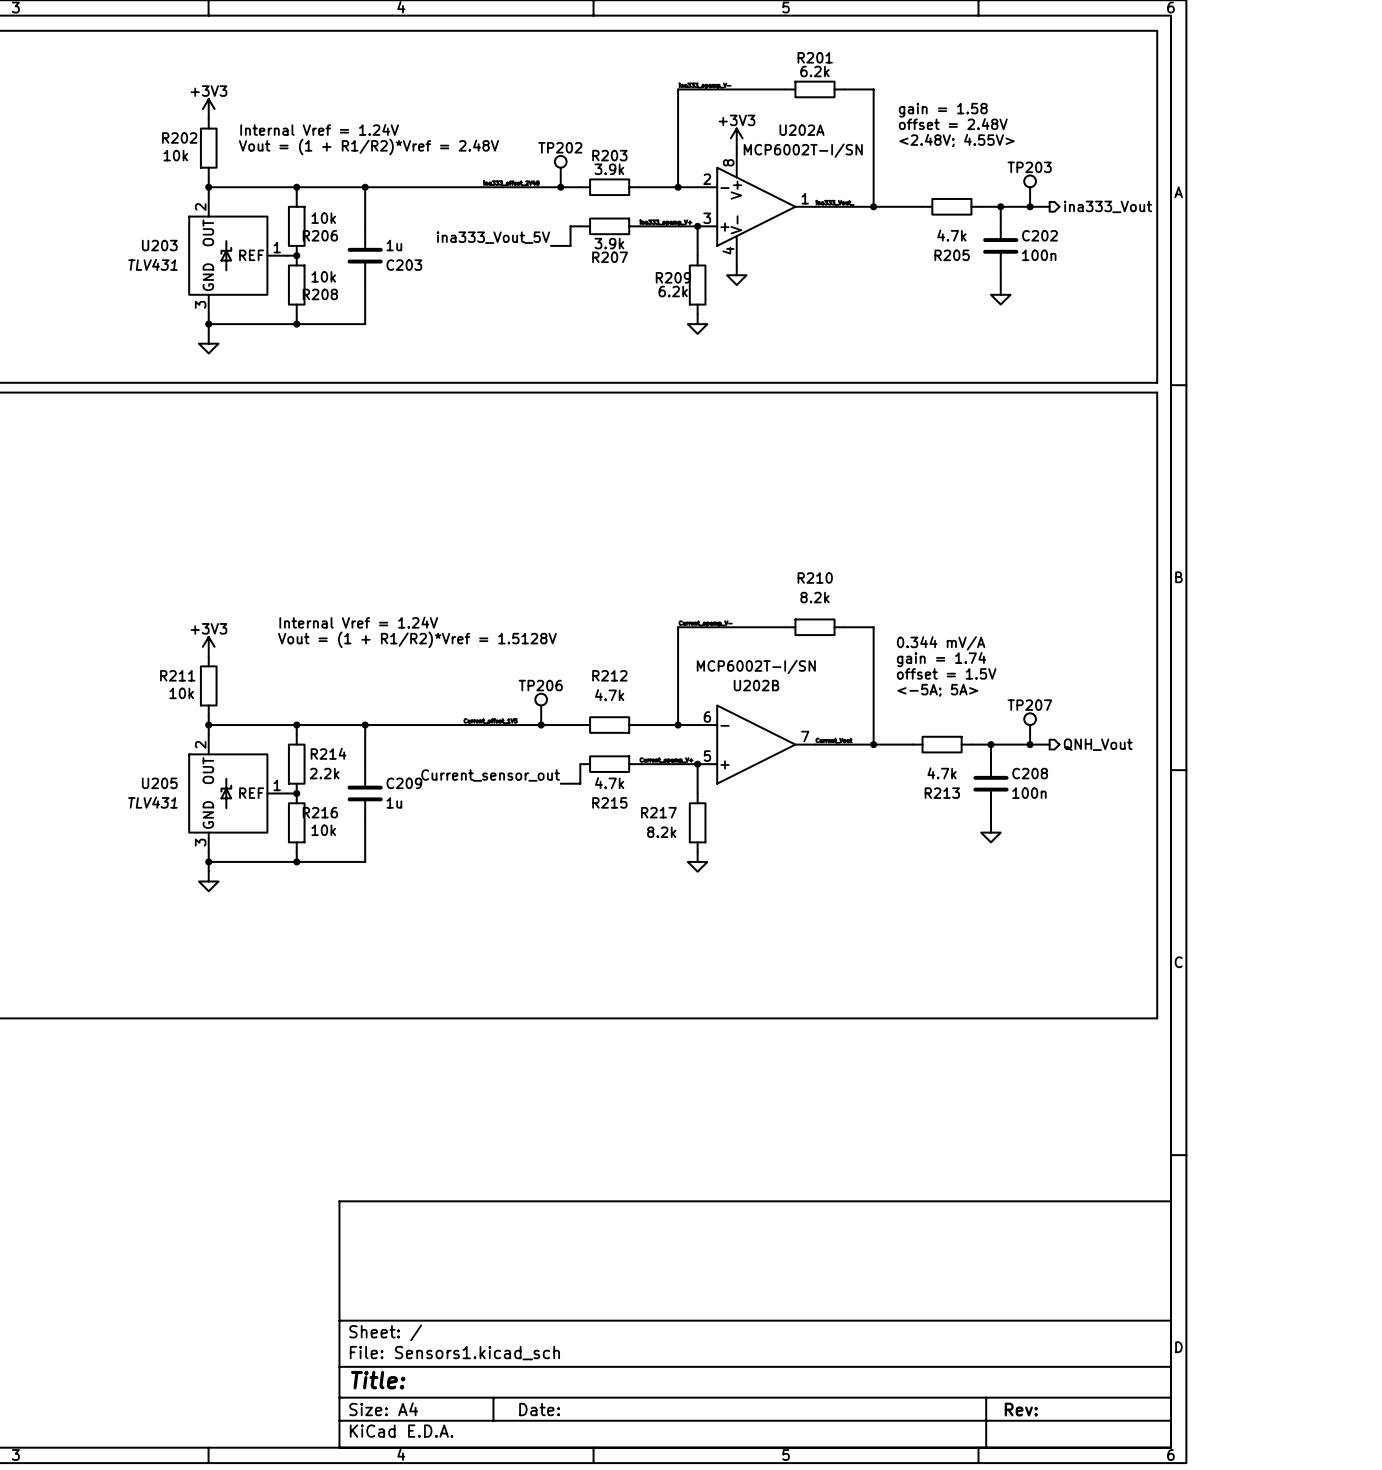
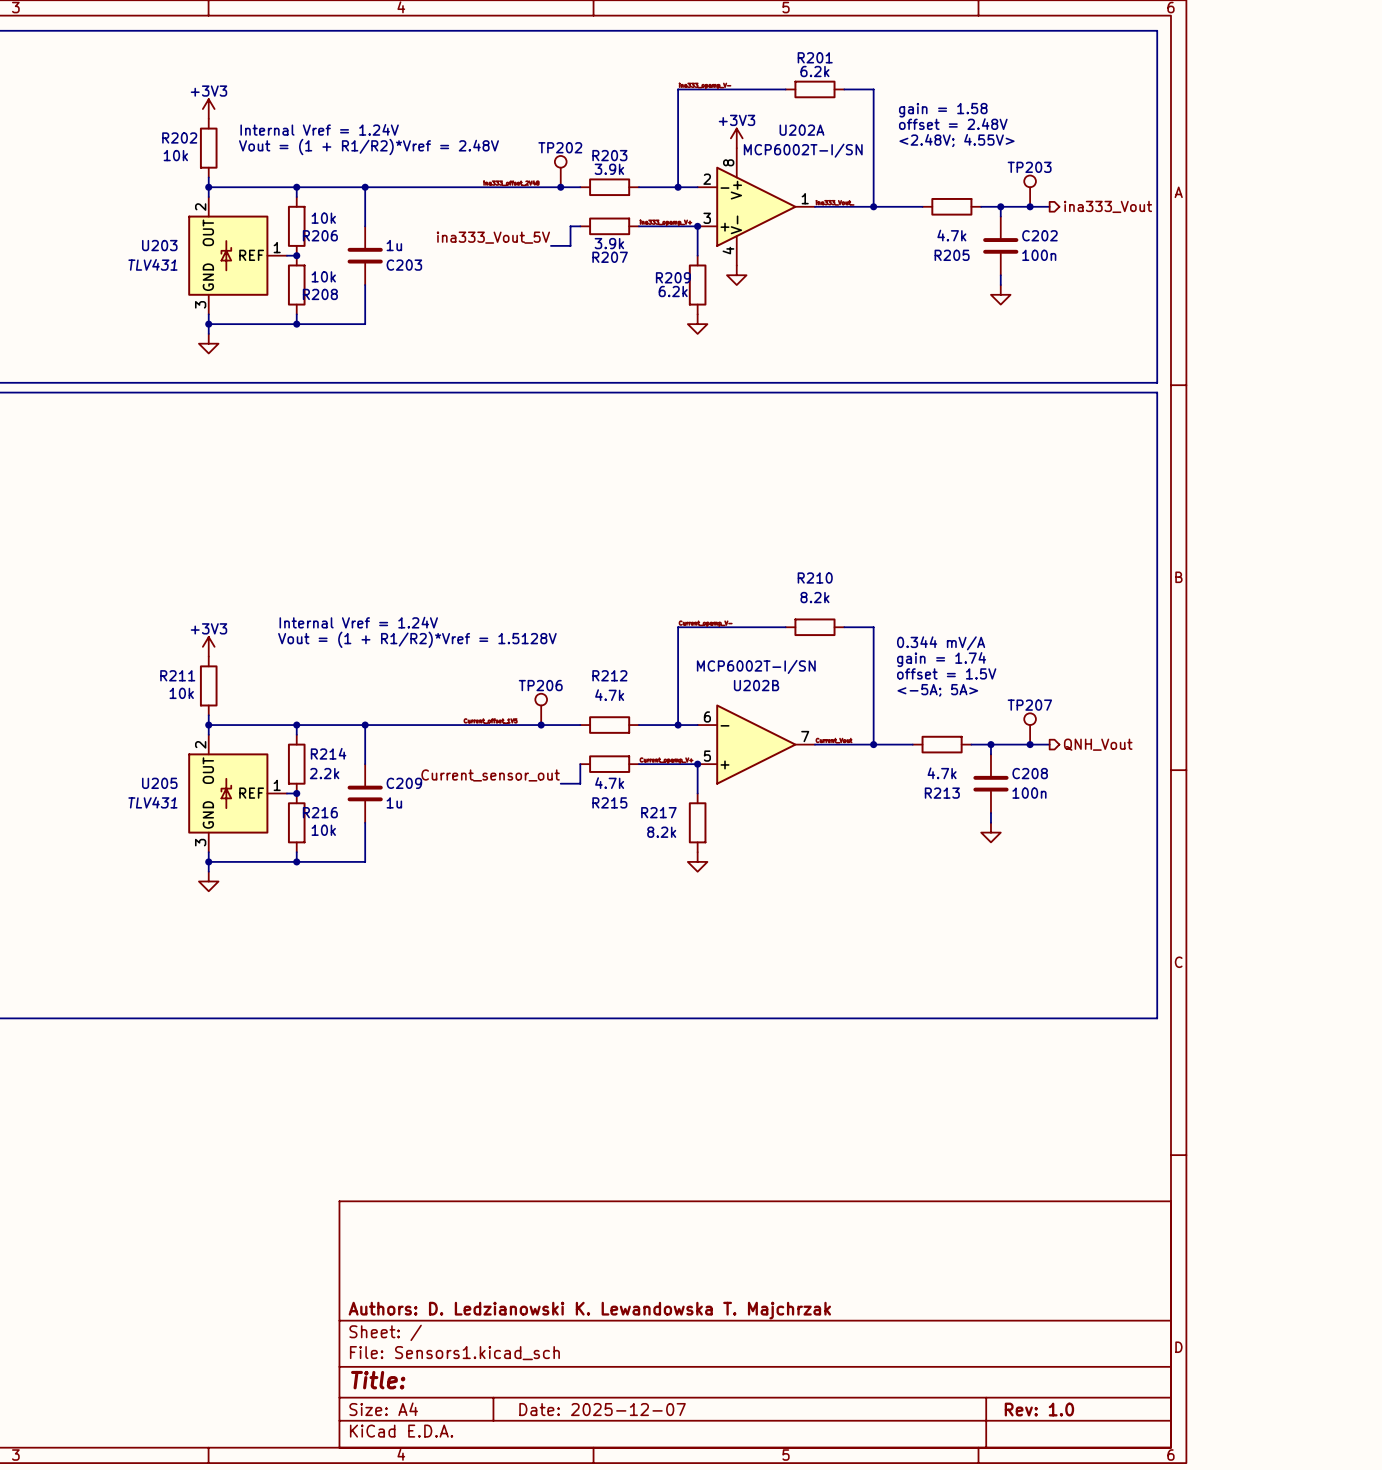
title block: none -> Authors: D. Ledzianowski K. Lewandowska T. Majchrzak (589, 1310)
title block: Date: (539, 1409) -> Date: 2025-12-07 (602, 1409)
title block: Rev: (1021, 1409) -> Rev: 1.0 (1039, 1409)

